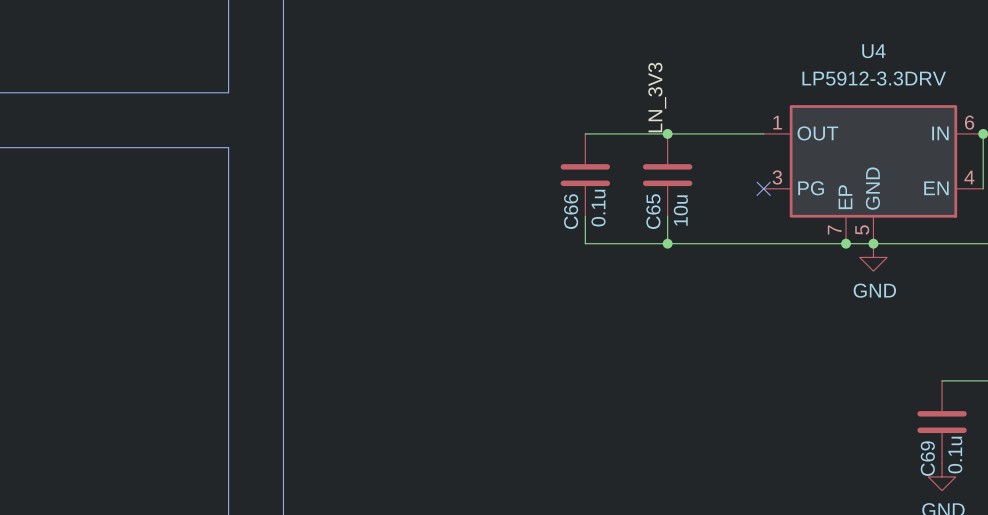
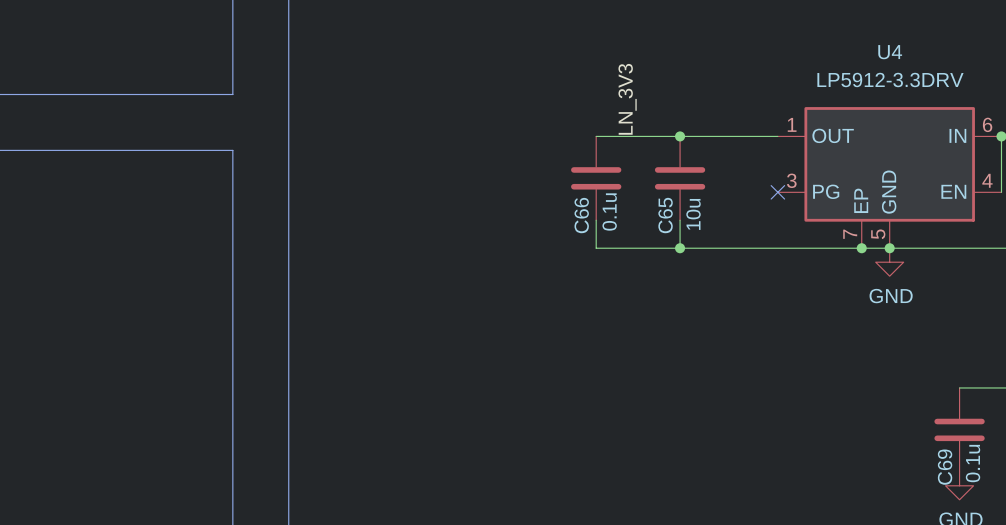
label position: LN_3V3 (657, 97) -> LN_3V3 (627, 99)

